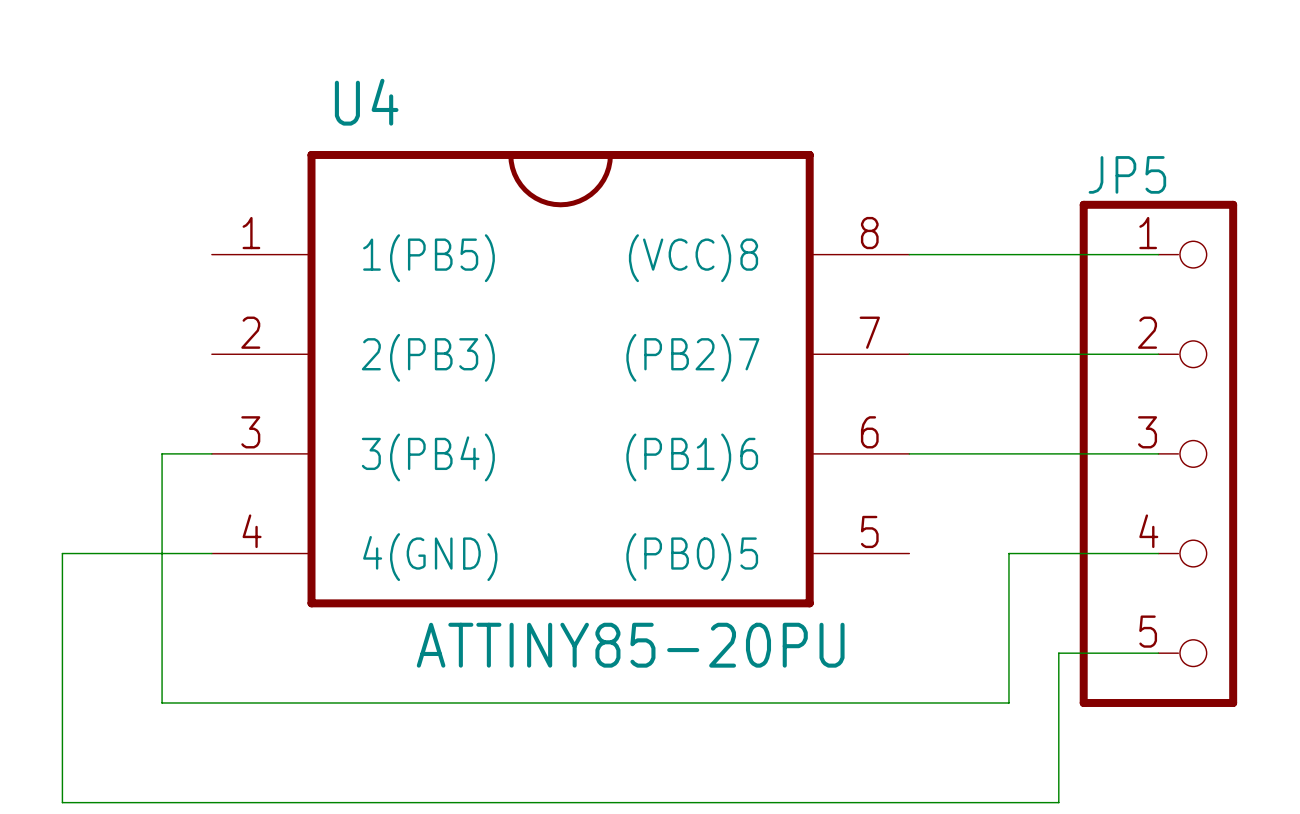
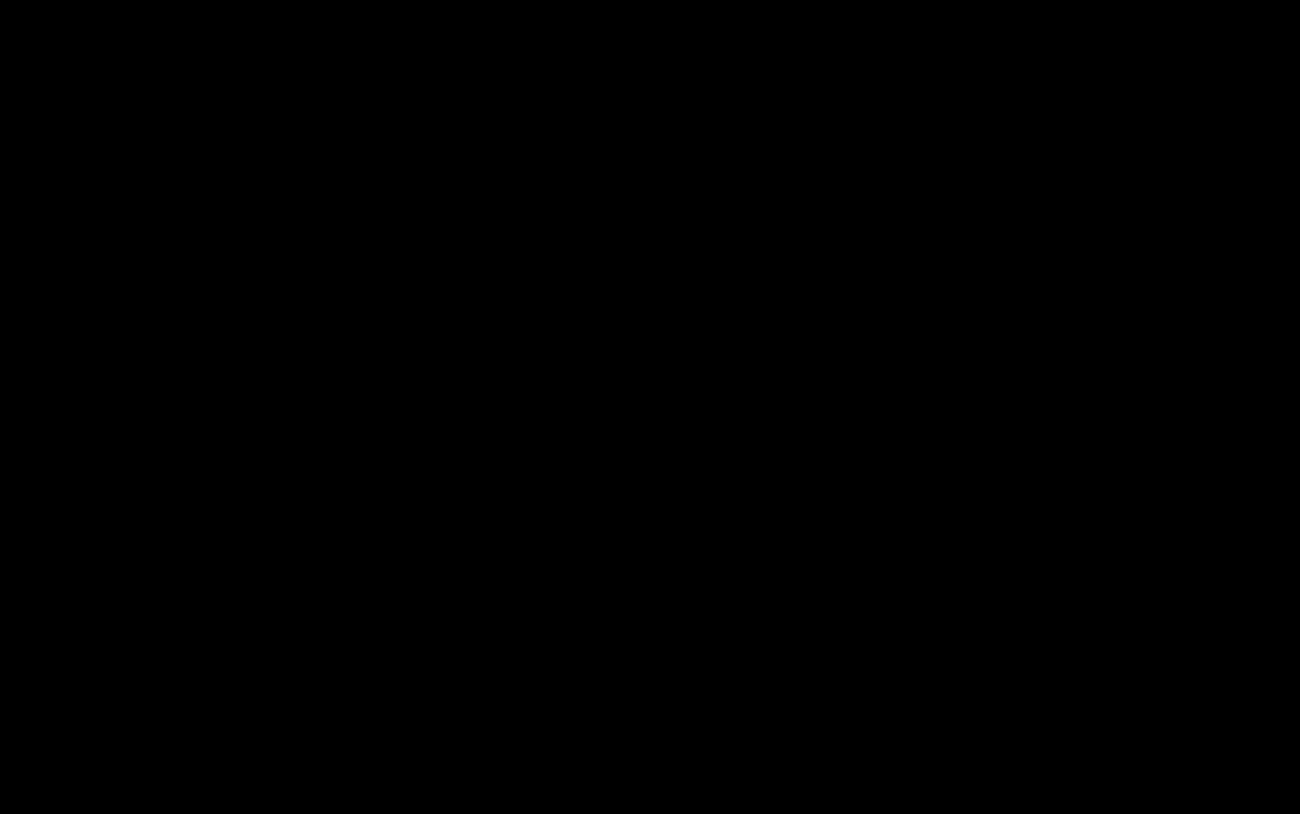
wire: (909, 254) (1158, 254) -> none
wire: (909, 354) (1158, 354) -> none
U4: ATTINY85-20PU (560, 379) -> none
wire: (211, 453) (162, 453) (162, 702) (1008, 702) (1008, 553) (1158, 553) -> none
wire: (909, 453) (1158, 453) -> none
JP5: (1158, 453) -> none
wire: (211, 553) (62, 553) (62, 802) (1058, 802) (1058, 653) (1158, 653) -> none

